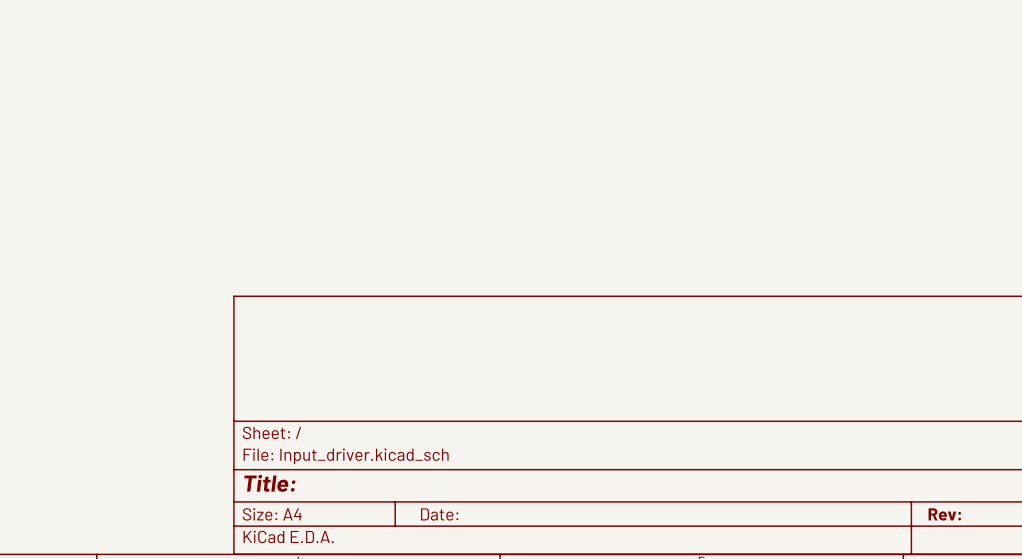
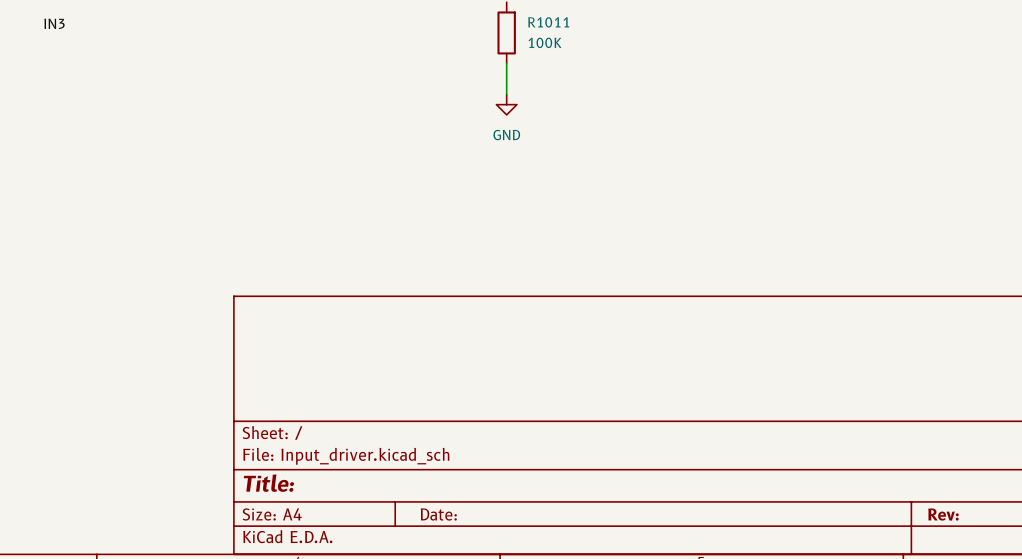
label: none -> IN3 (54, 23)
R1011: none -> 100K (506, 32)
wire: none -> (506, 63) (506, 94)
power symbol: none -> GND (506, 104)

